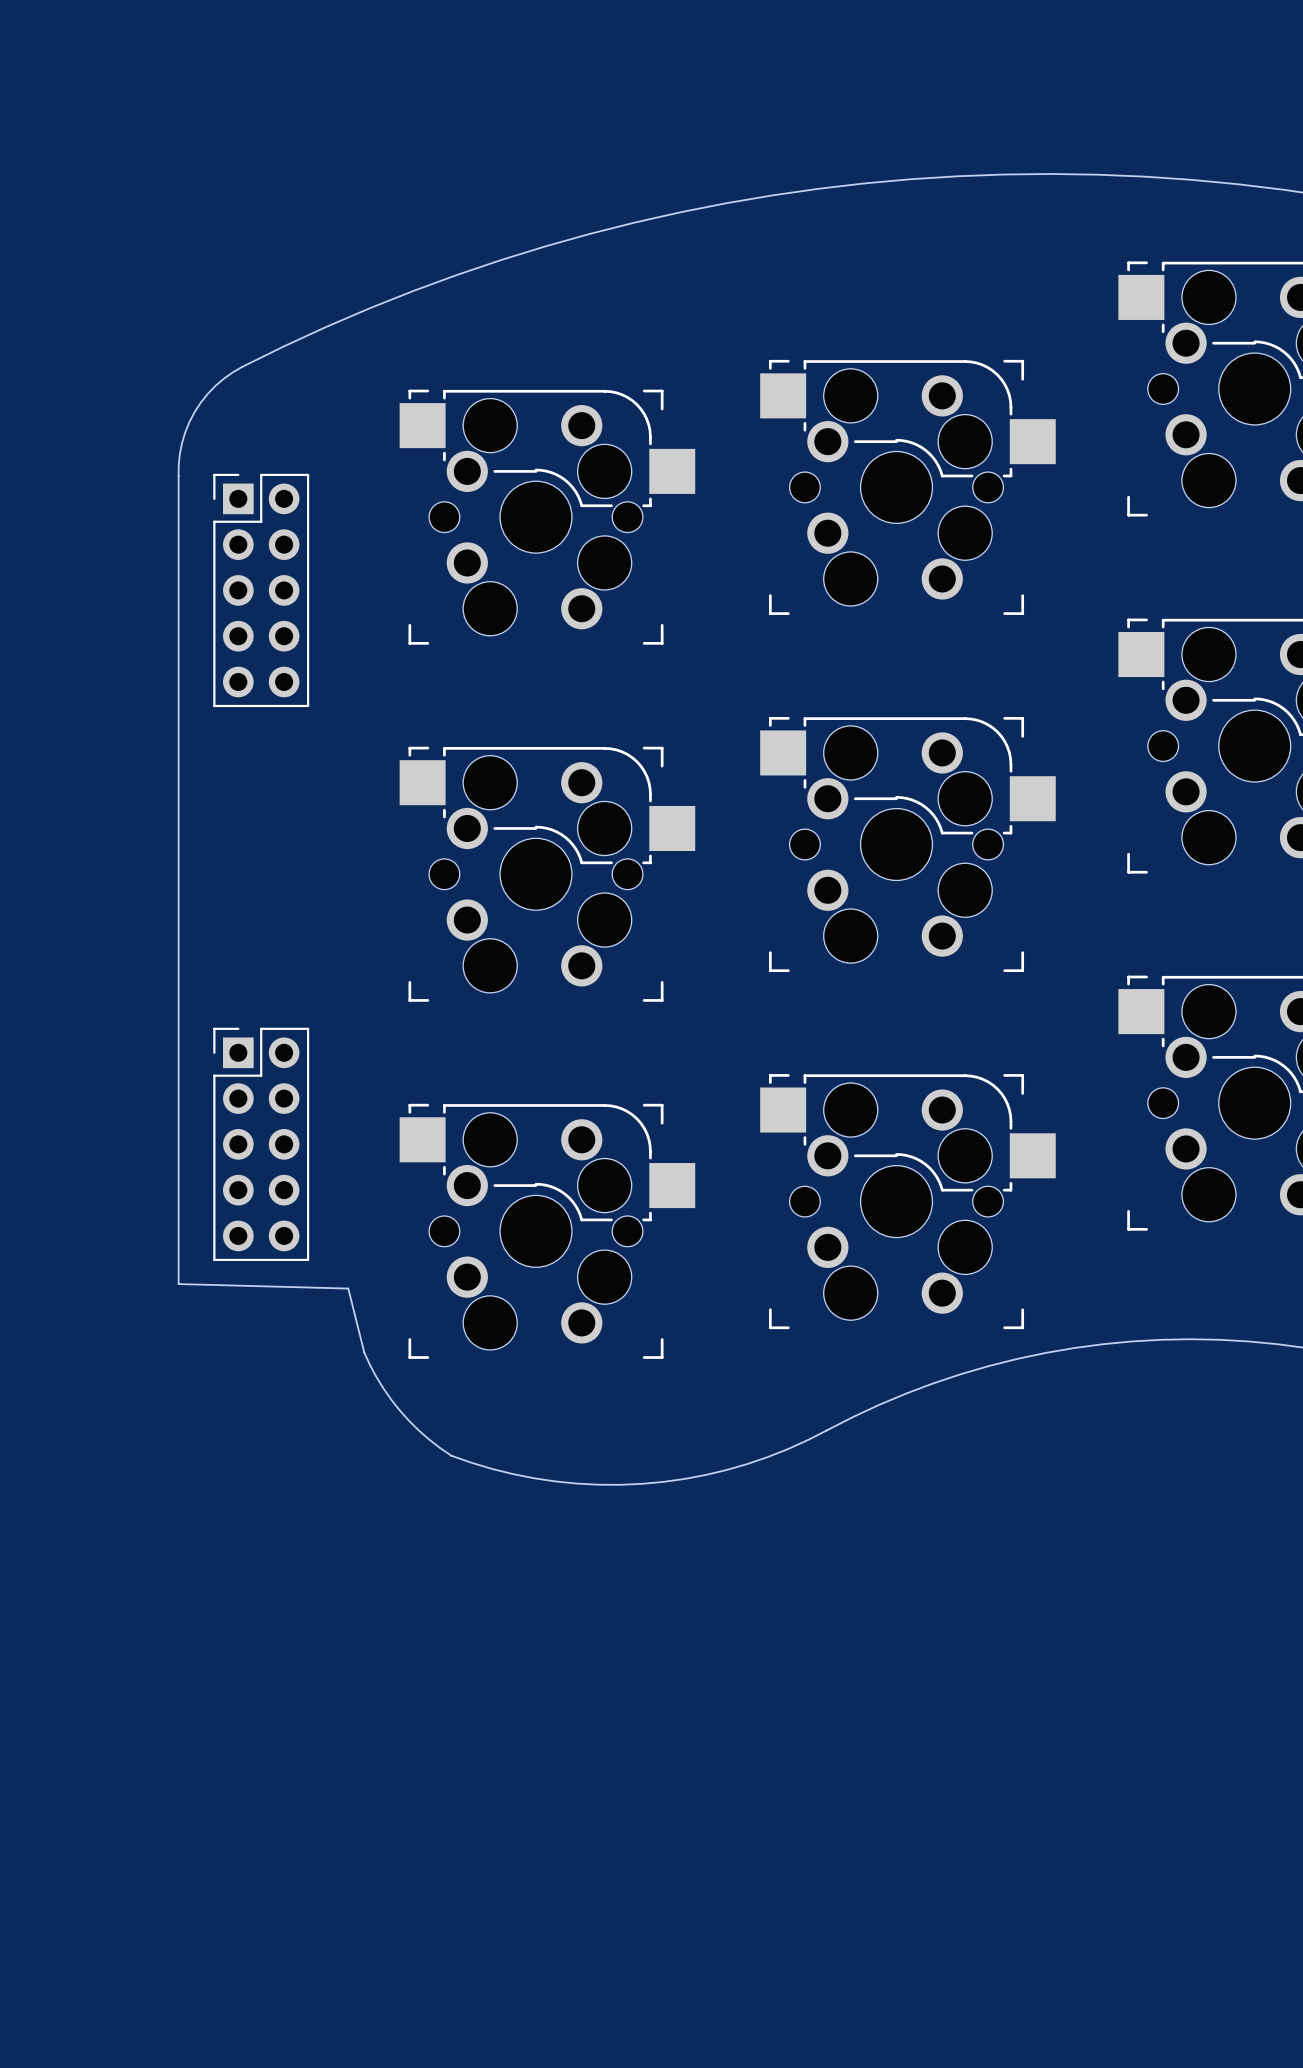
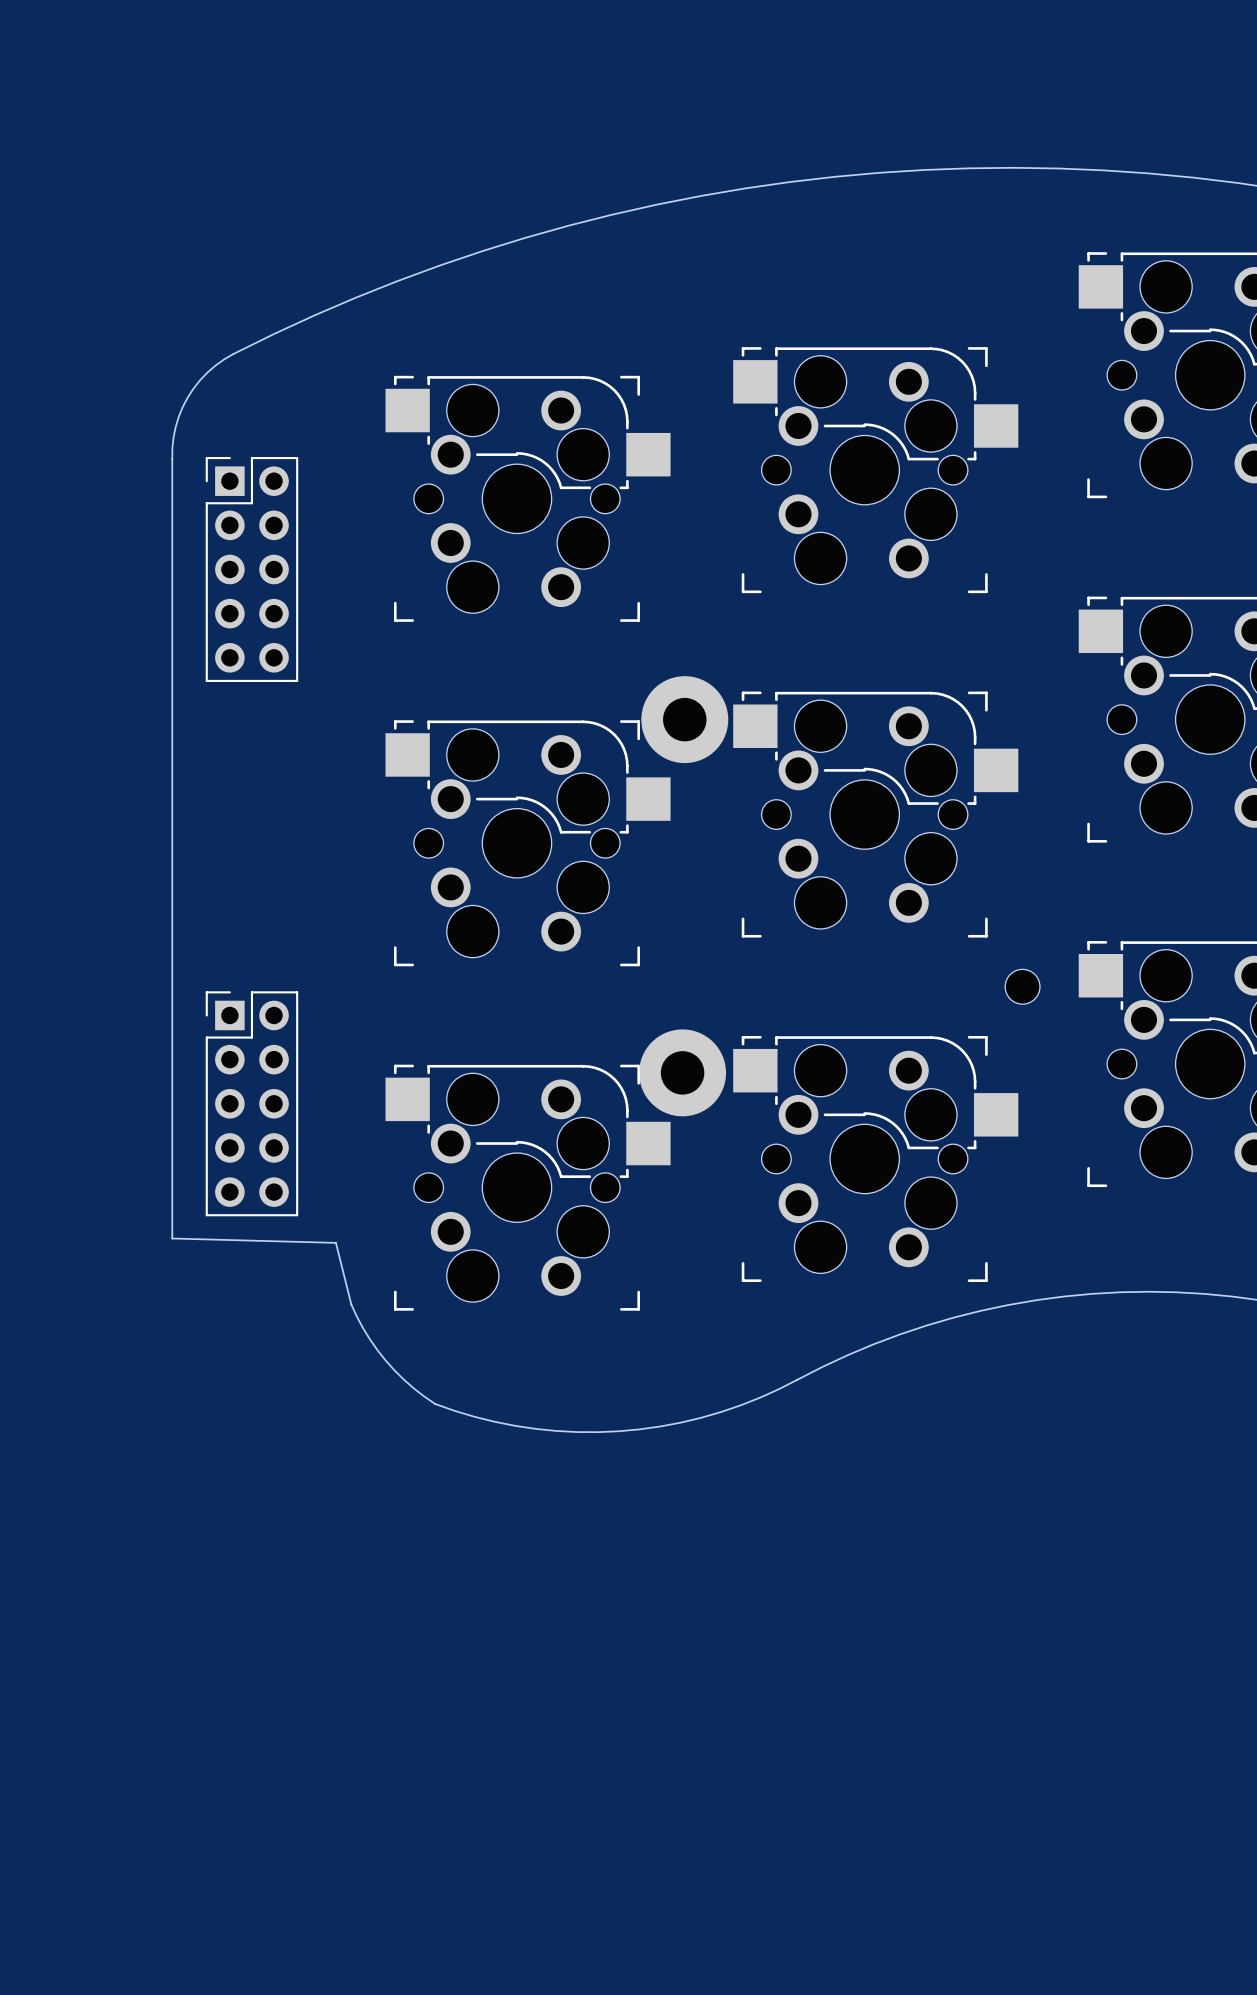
part: none -> (684, 719)
part: none -> (1022, 986)
part: none -> (682, 1072)

